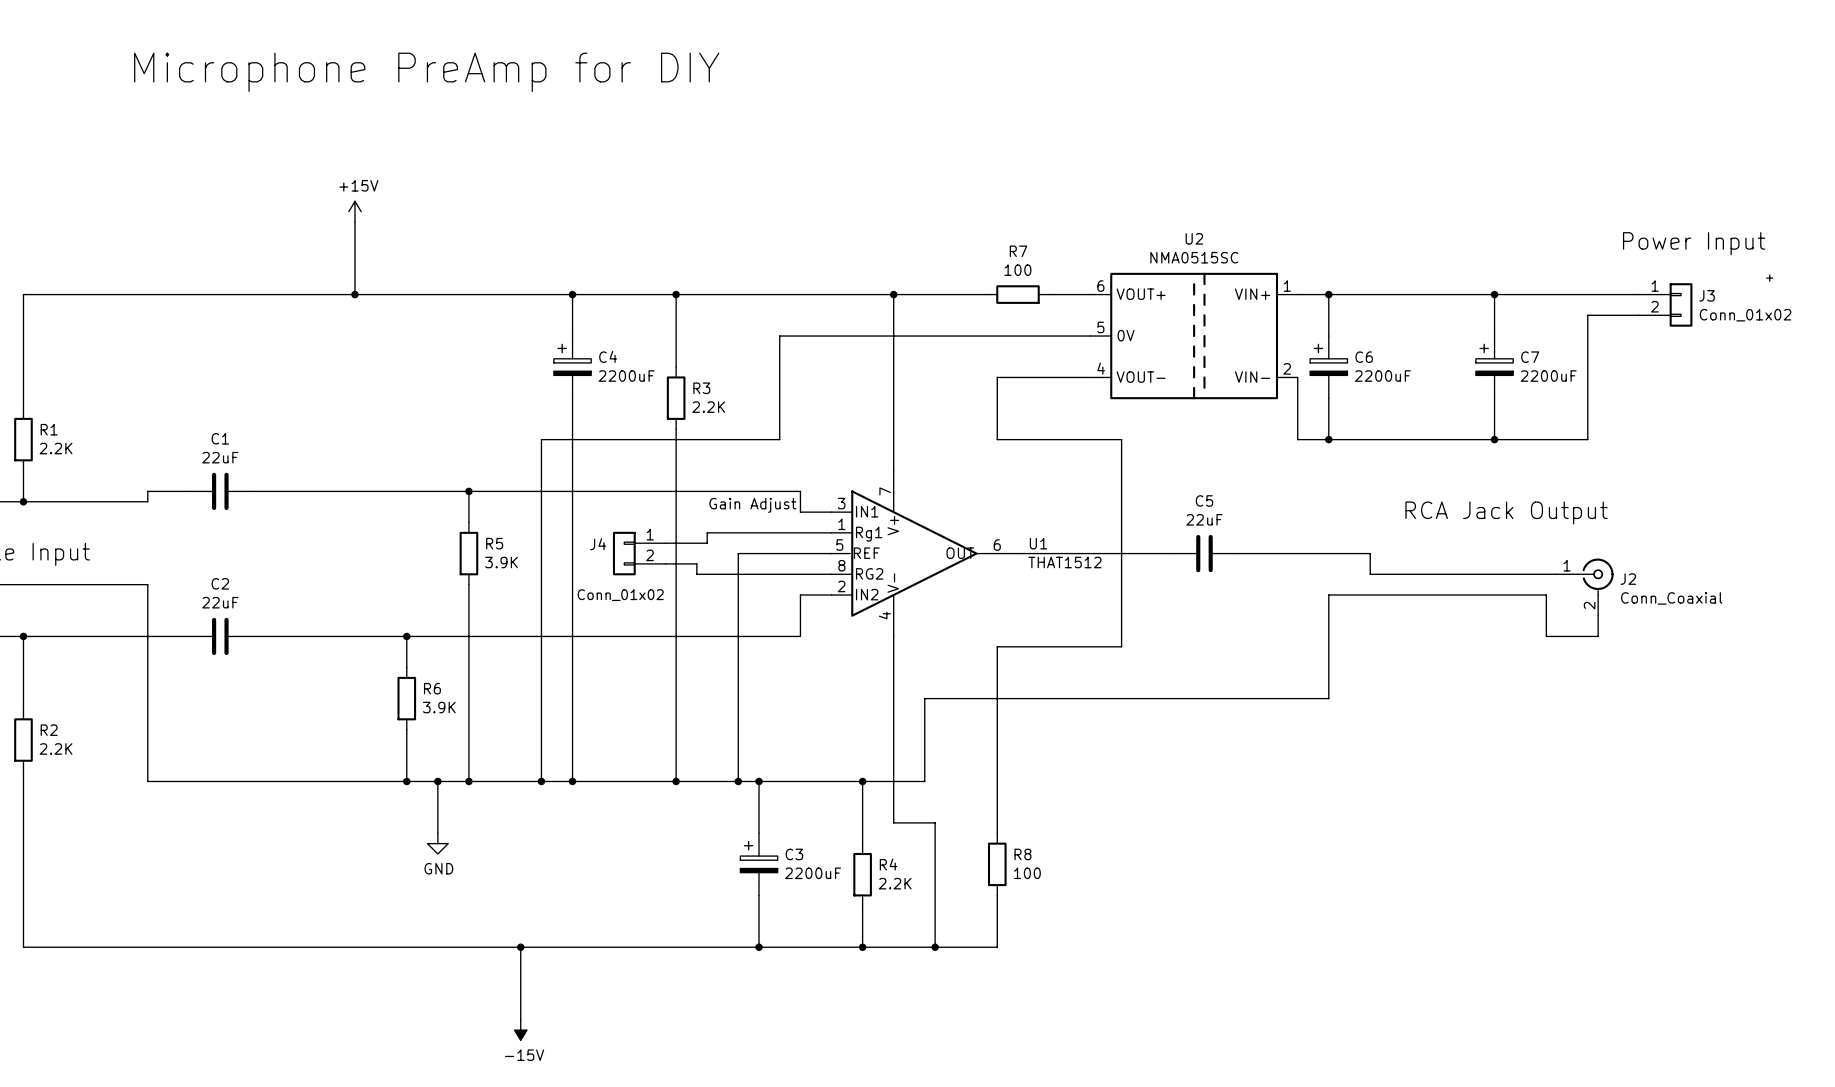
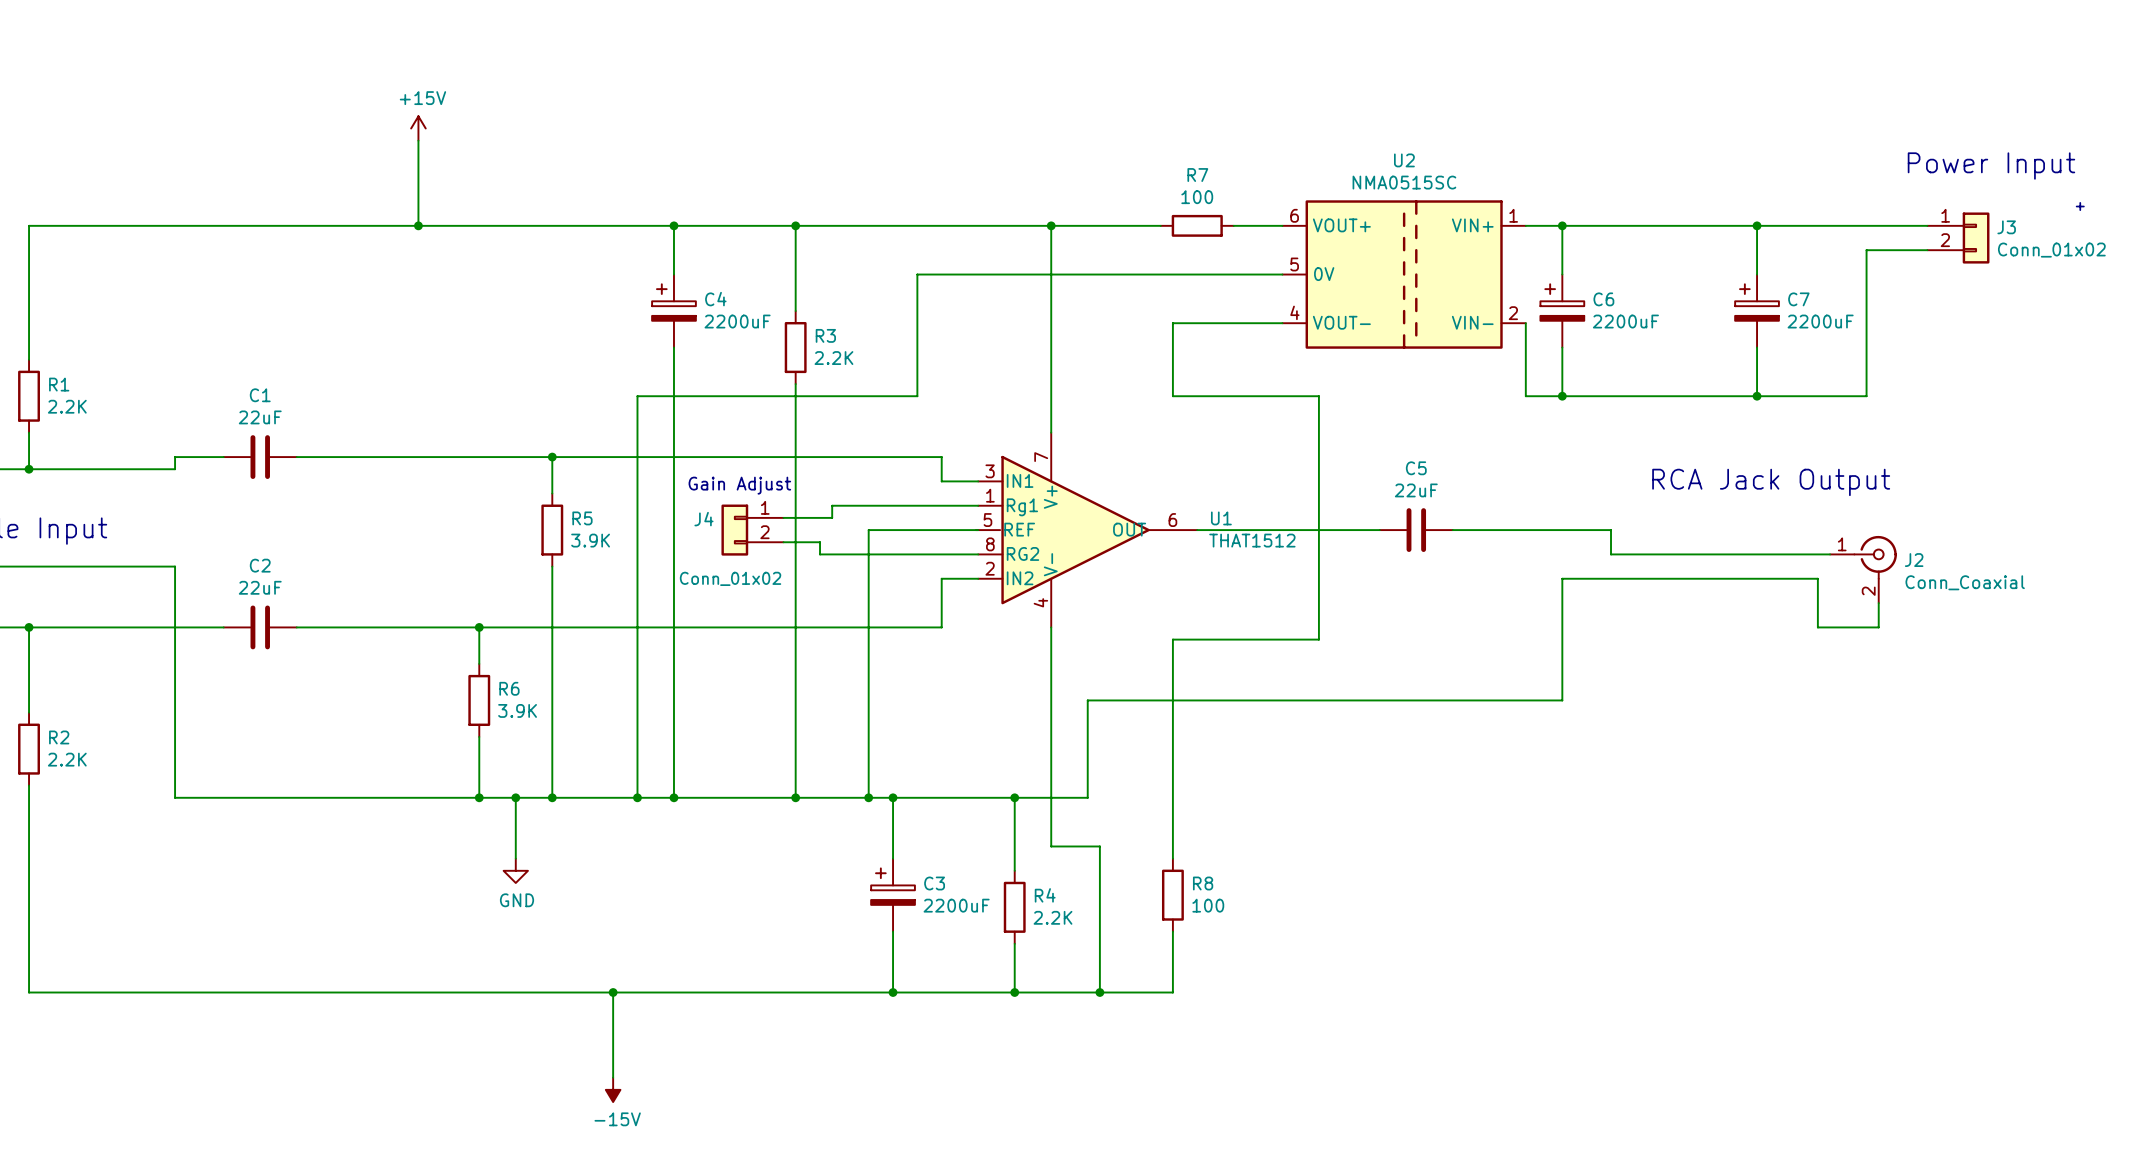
text position: Gain Adjust (752, 505) -> Gain Adjust (739, 485)

